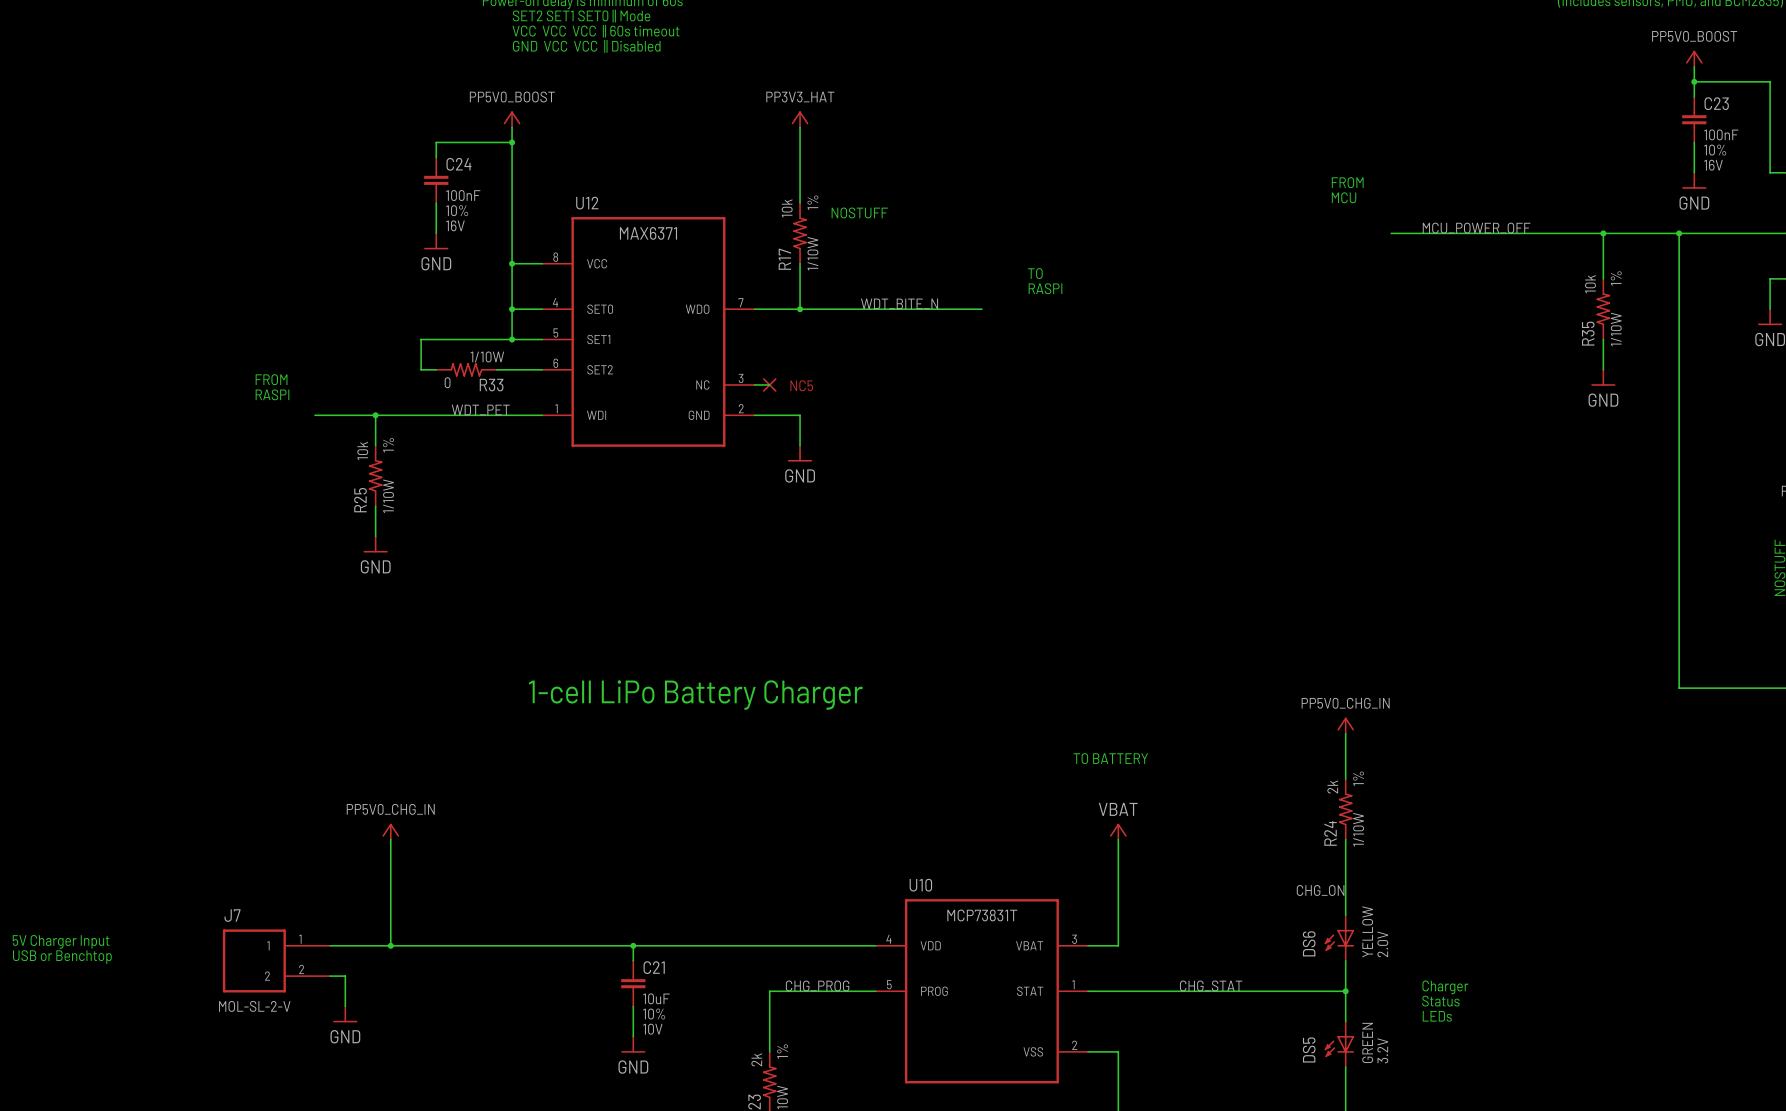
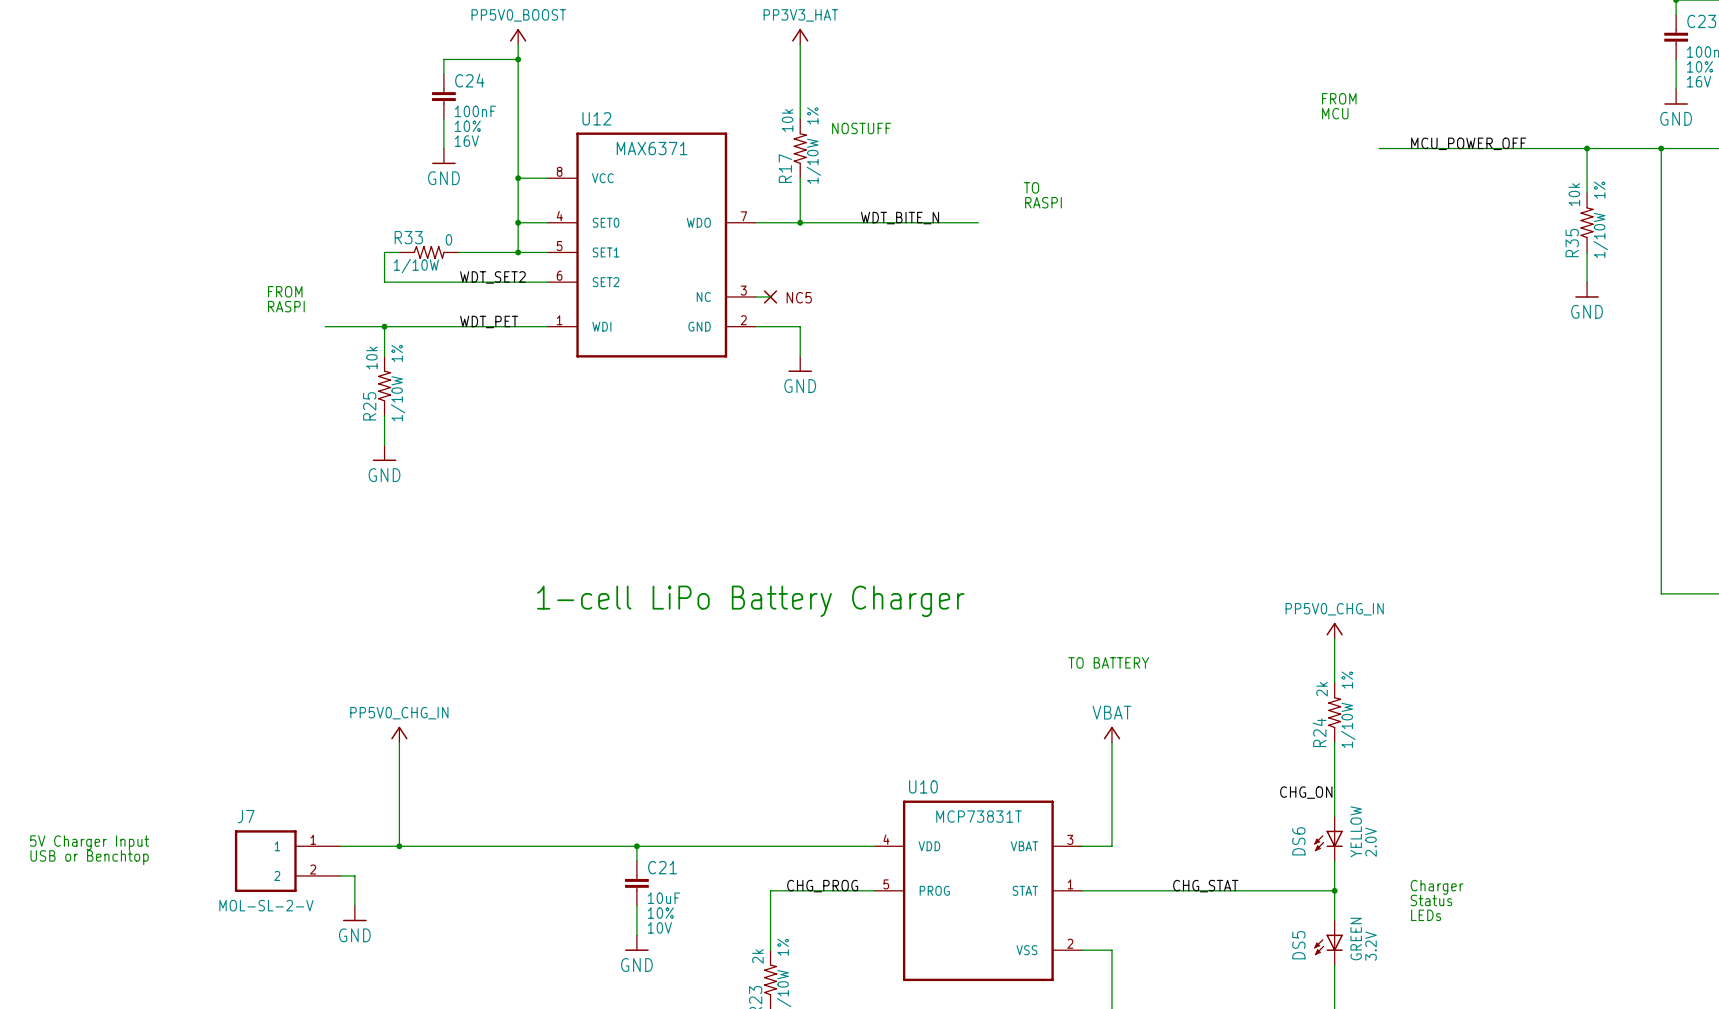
wire: (451, 339) (421, 339) (421, 369) -> (399, 252) (384, 252) (384, 282) (429, 282)
label: none -> WDT_SET2 (492, 277)
R33 rotation: 0° (466, 369) -> 180° (429, 252)
R33 position: (466, 369) -> (429, 252)

